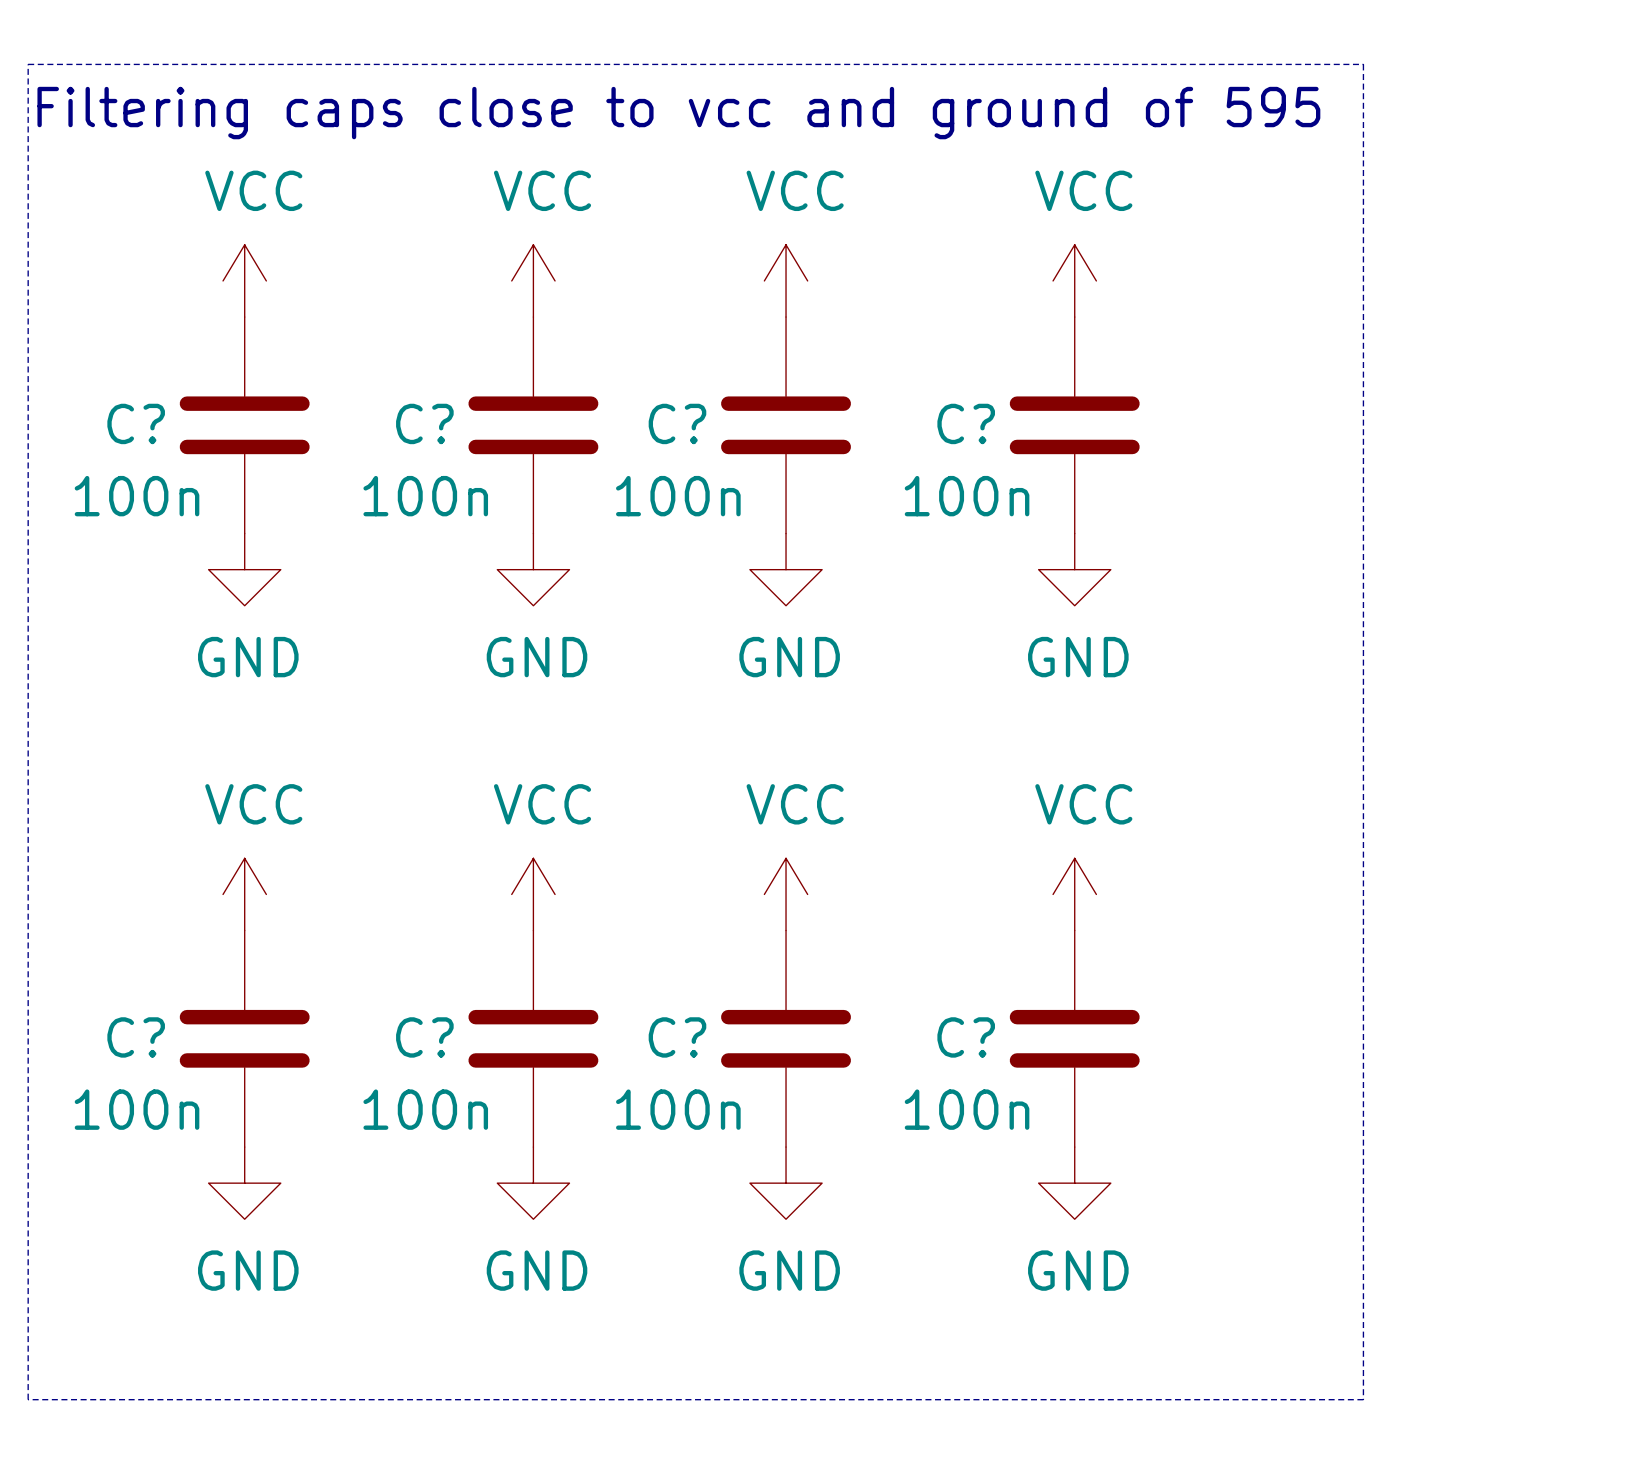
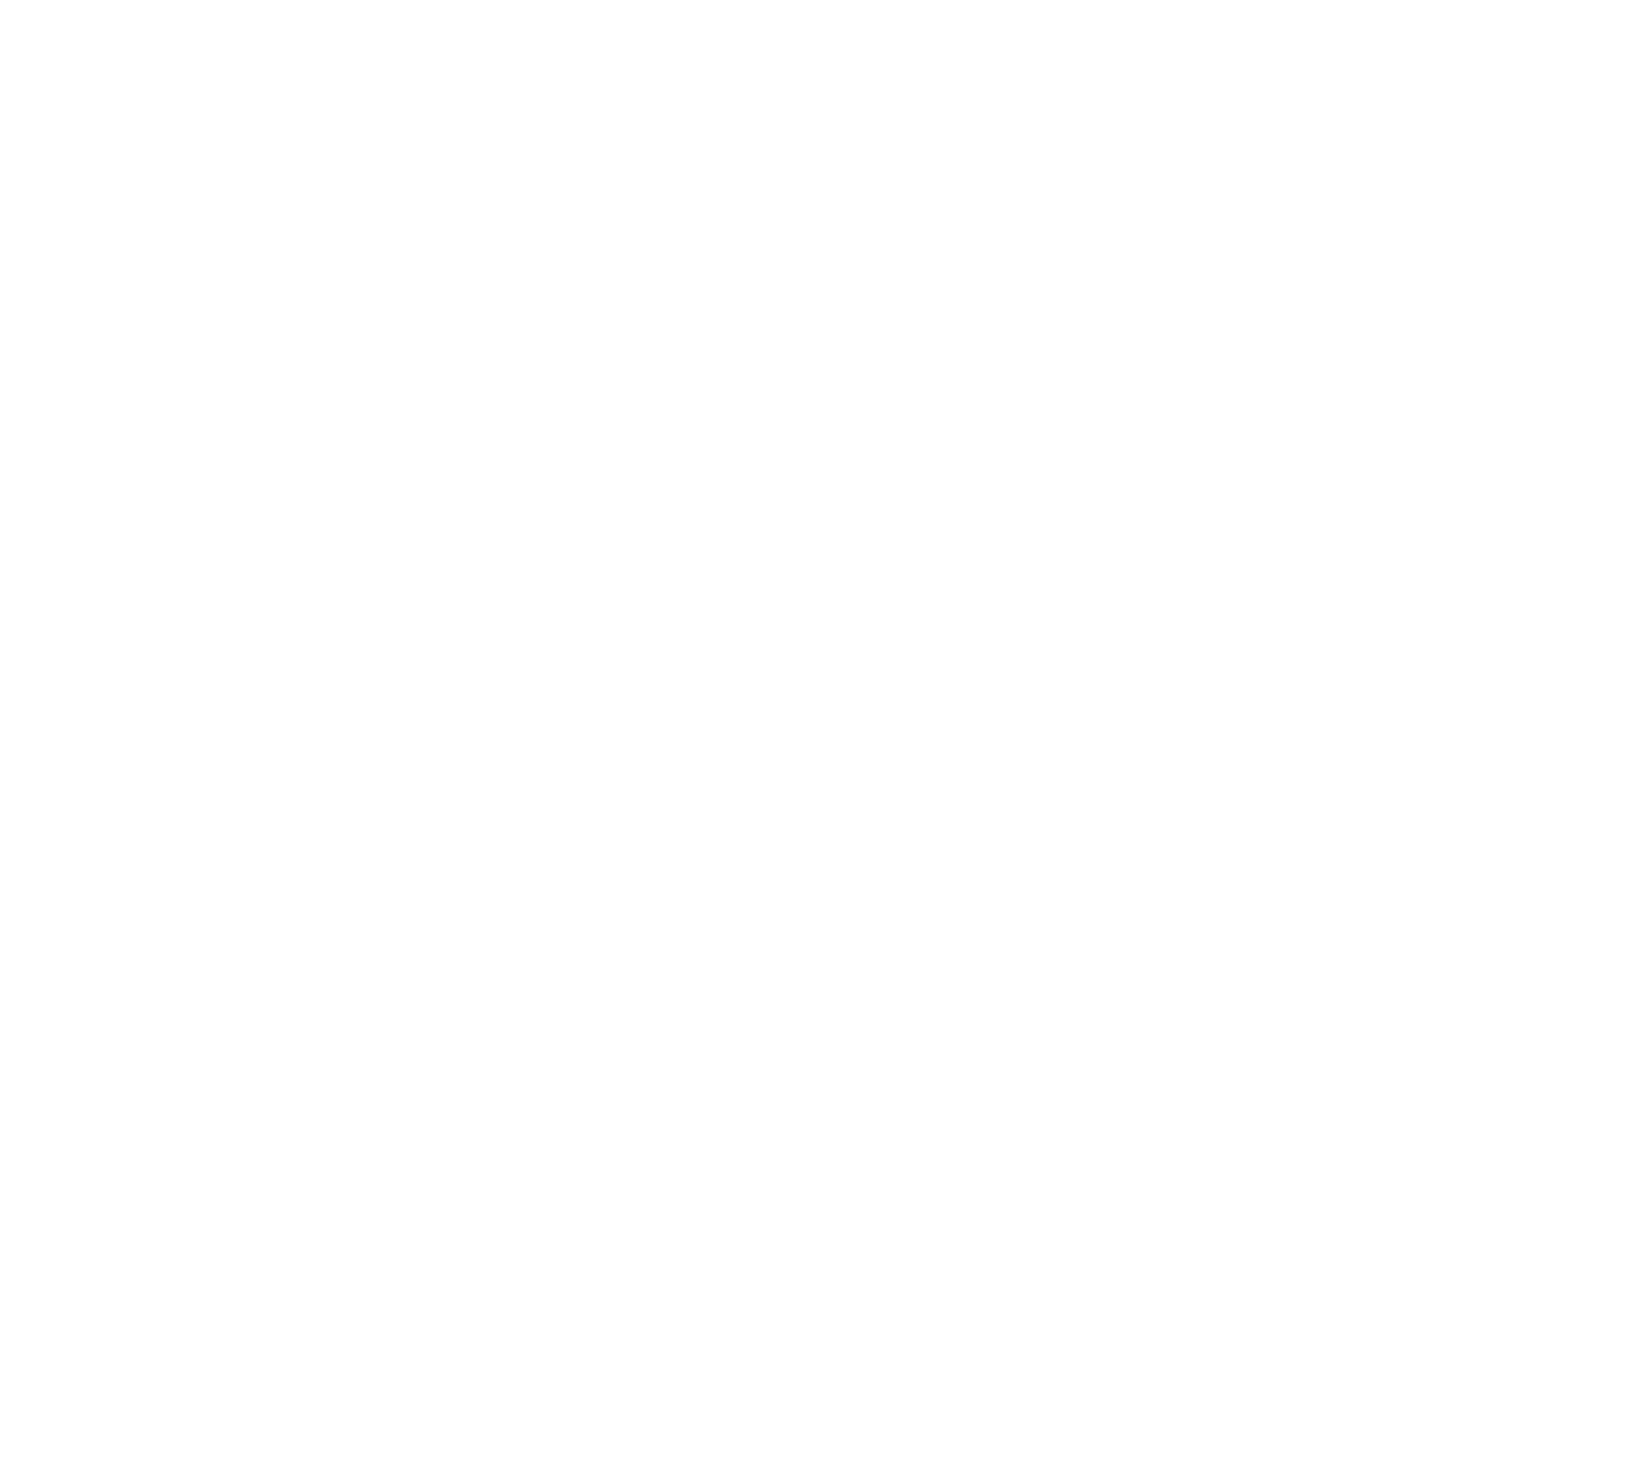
line: (28, 64) (1363, 64) (1363, 1399) (28, 1399) (28, 64) -> none
text: Filtering caps close to vcc and ground of 595 (678, 113) -> none
power symbol: VCC (244, 280) -> none
power symbol: VCC (533, 280) -> none
power symbol: VCC (786, 280) -> none
power symbol: VCC (1074, 280) -> none
C?: 100n (244, 425) -> none
C?: 100n (533, 425) -> none
C?: 100n (786, 425) -> none
C?: 100n (1074, 425) -> none
power symbol: GND (244, 569) -> none
power symbol: GND (533, 569) -> none
power symbol: GND (786, 569) -> none
power symbol: GND (1074, 569) -> none
power symbol: VCC (244, 894) -> none
power symbol: VCC (533, 894) -> none
power symbol: VCC (786, 894) -> none
power symbol: VCC (1074, 894) -> none
C?: 100n (244, 1038) -> none
C?: 100n (533, 1038) -> none
C?: 100n (786, 1038) -> none
C?: 100n (1074, 1038) -> none
power symbol: GND (244, 1183) -> none
power symbol: GND (533, 1183) -> none
power symbol: GND (786, 1183) -> none
power symbol: GND (1074, 1183) -> none

